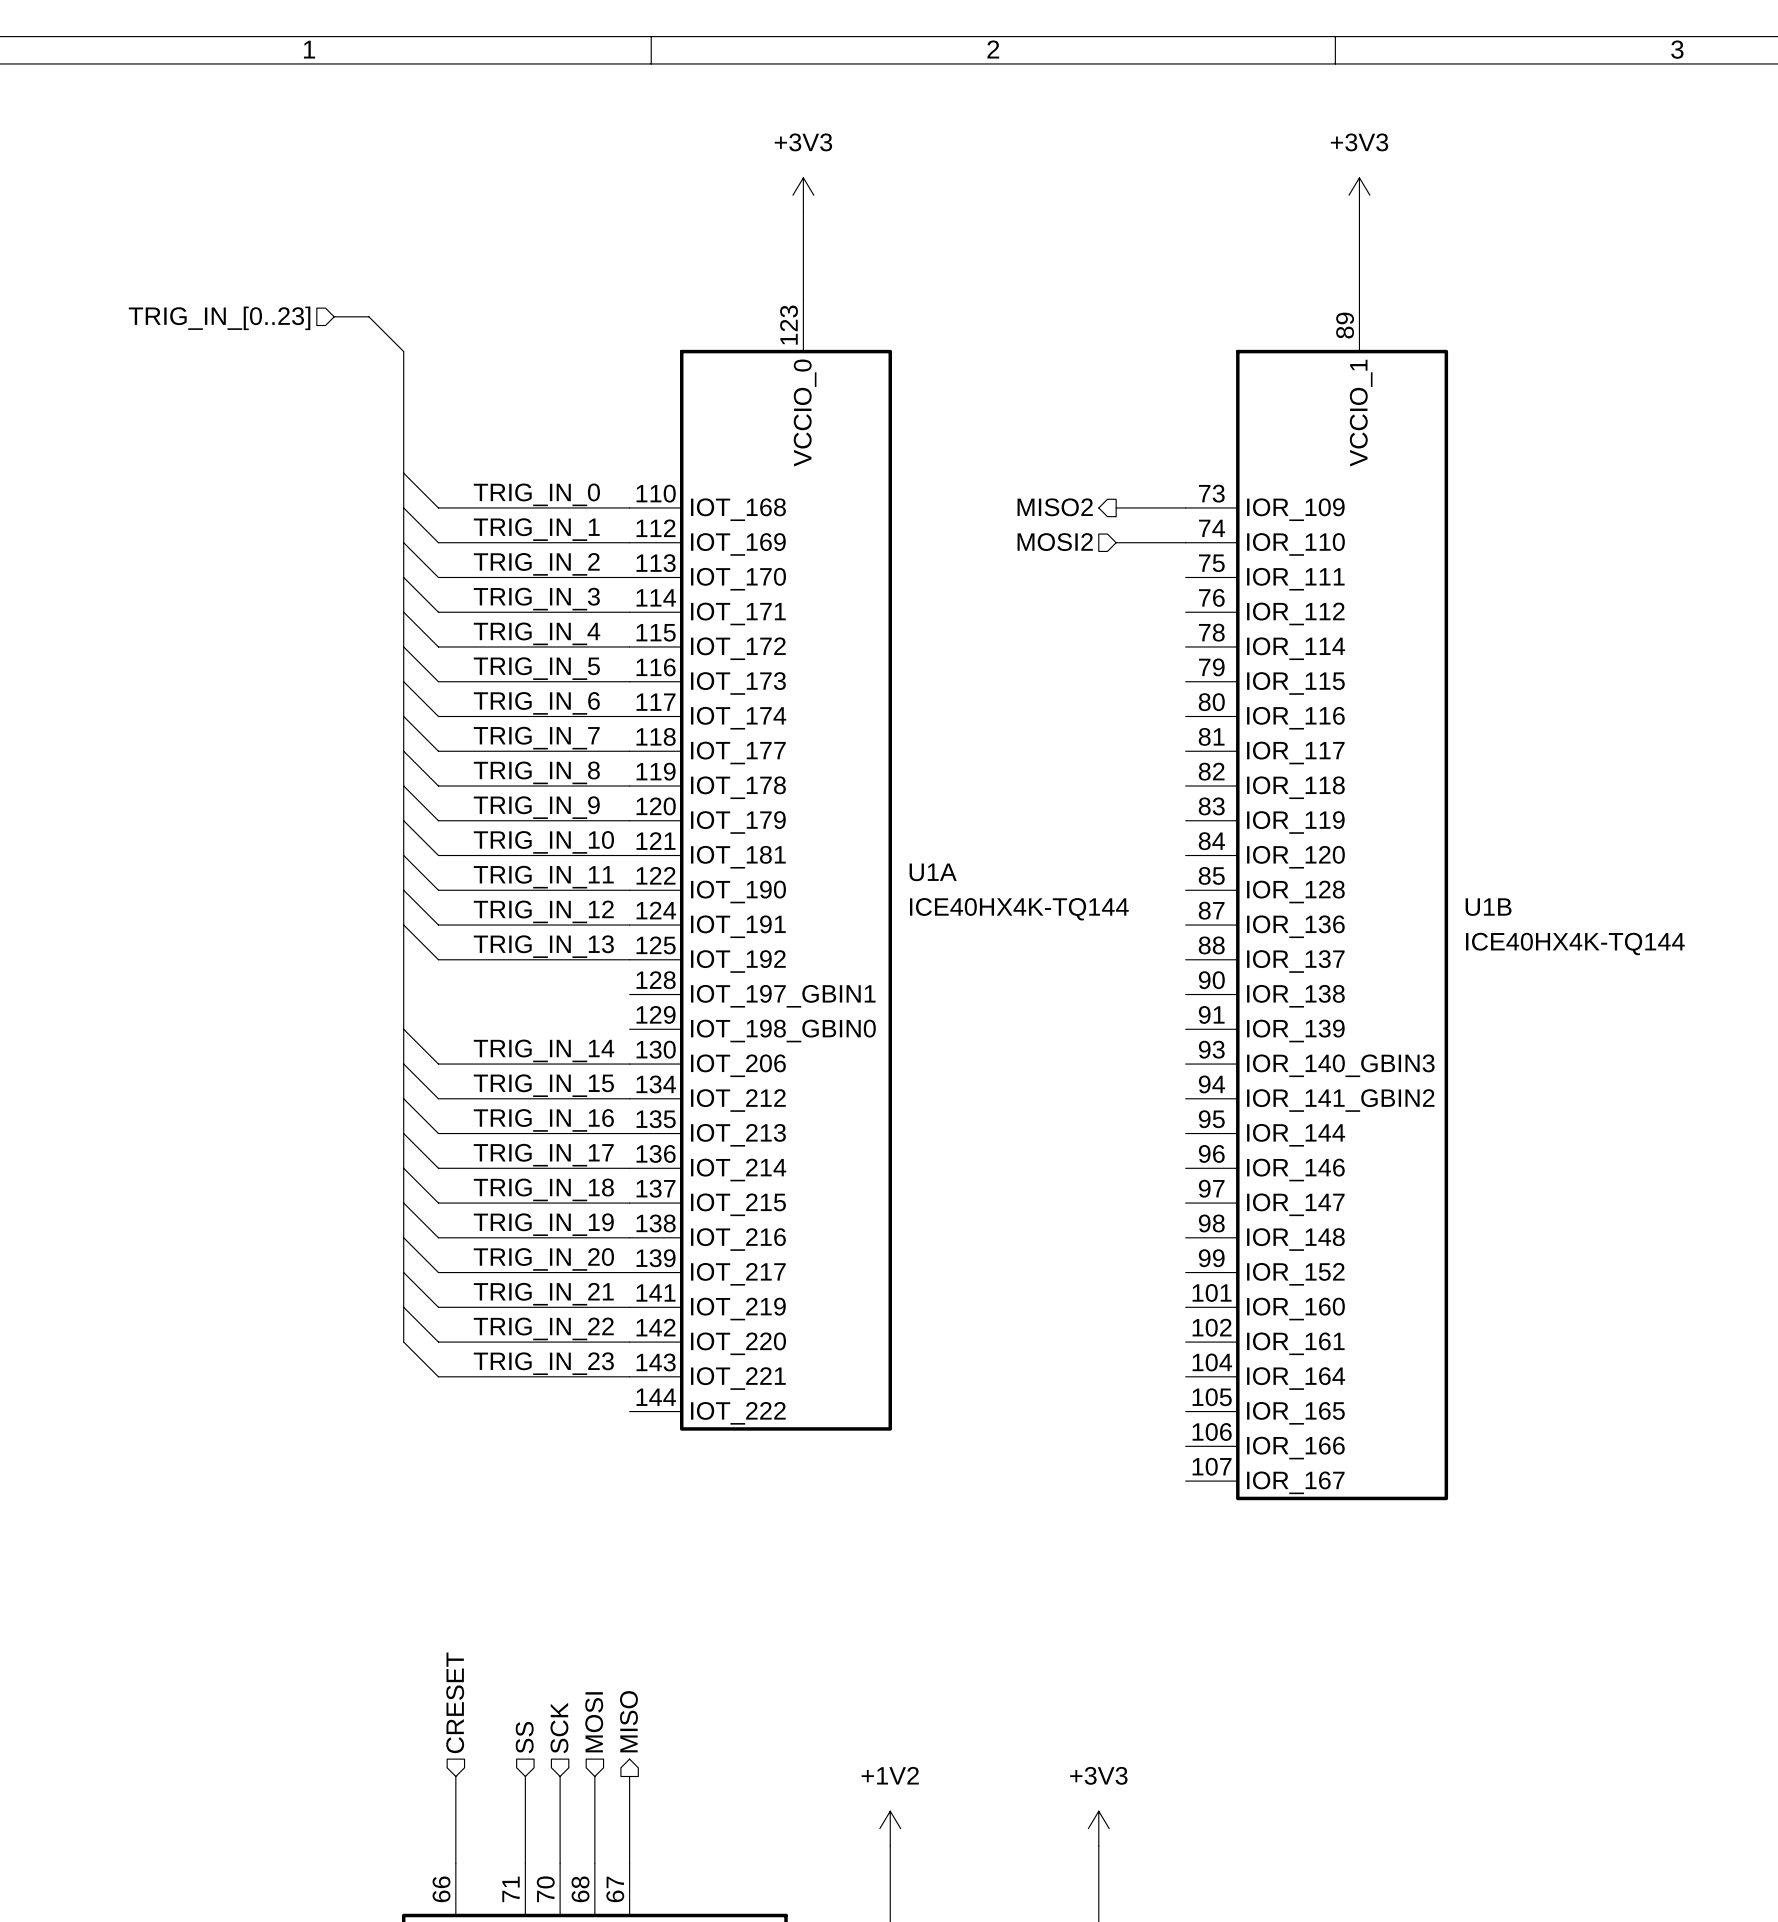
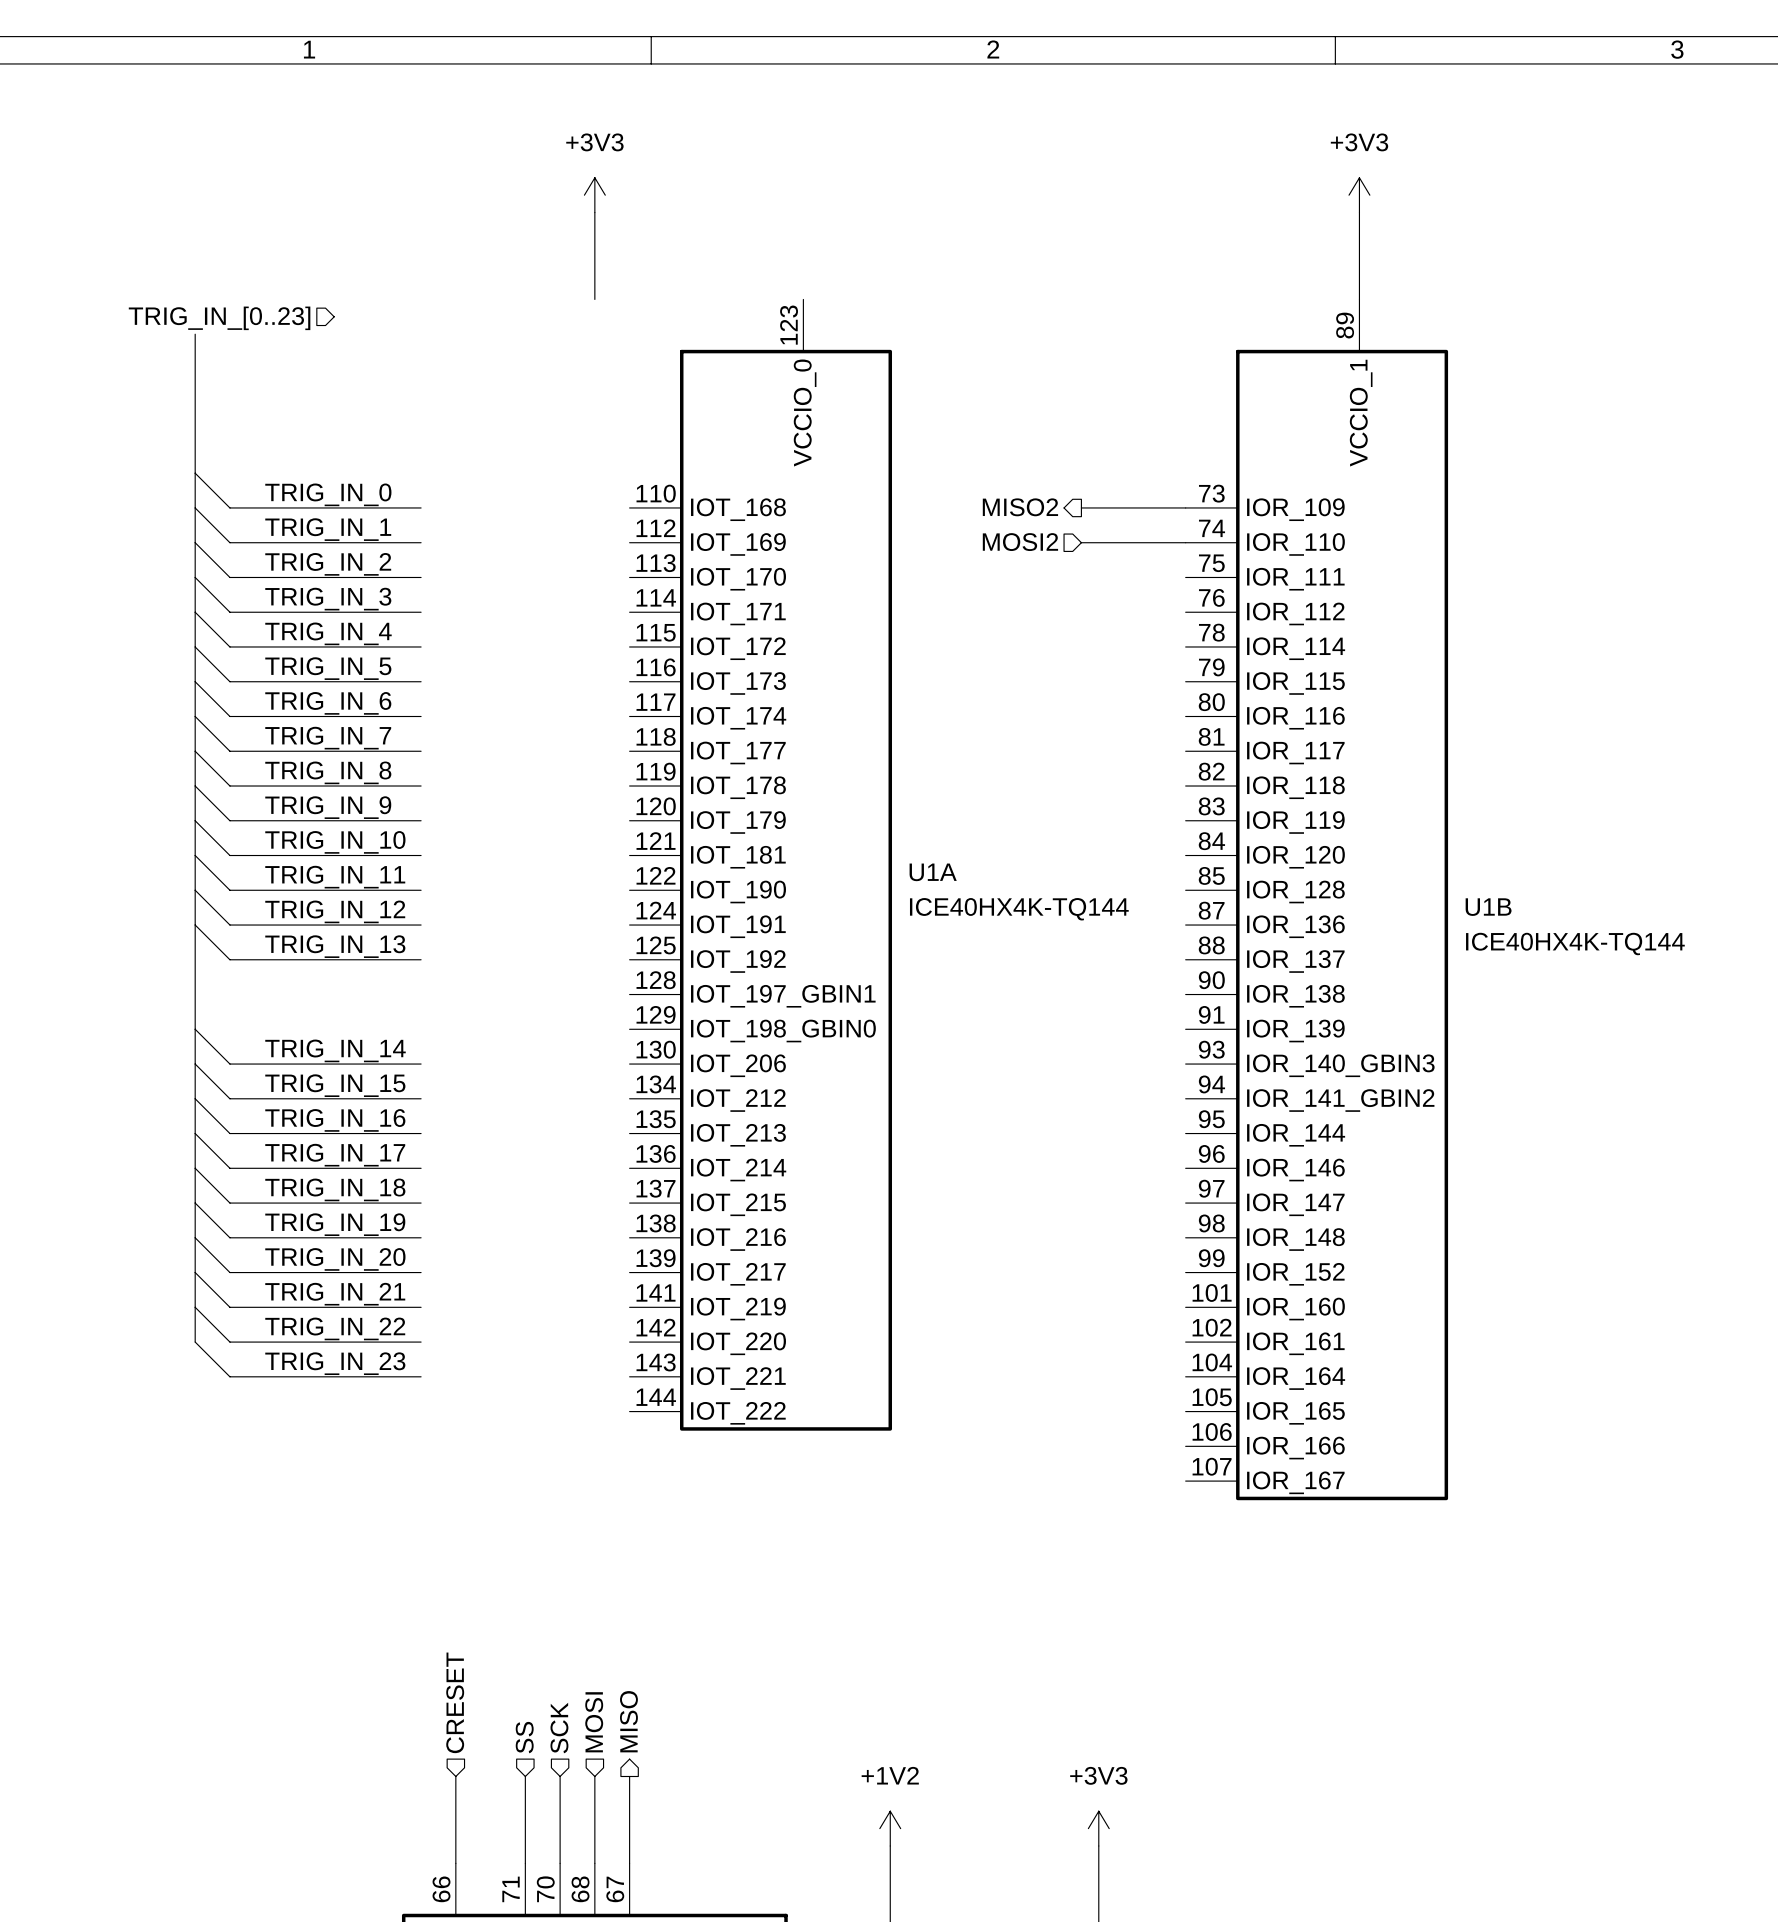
power symbol position: +3V3 (803, 195) -> +3V3 (594, 195)
wire: (803, 212) (803, 299) -> (594, 212) (594, 299)
bus: (334, 316) (368, 316) (403, 351) (403, 1342) -> none
bus: none -> (195, 334) (195, 1342)
wire: (403, 473) (438, 507) (629, 507) -> (195, 473) (229, 507) (421, 507)
label position: TRIG_IN_0 (536, 494) -> TRIG_IN_0 (328, 494)
wire: (403, 507) (438, 542) (629, 542) -> (195, 507) (229, 542) (421, 542)
hierarchical label position: MISO2 (1055, 507) -> MISO2 (1020, 507)
wire: none -> (1081, 507) (1116, 507)
label position: TRIG_IN_1 (536, 529) -> TRIG_IN_1 (328, 529)
wire: (403, 542) (438, 577) (629, 577) -> (195, 542) (229, 577) (421, 577)
hierarchical label position: MOSI2 (1055, 542) -> MOSI2 (1020, 542)
wire: none -> (1081, 542) (1116, 542)
label position: TRIG_IN_2 (536, 564) -> TRIG_IN_2 (328, 564)
wire: (403, 577) (438, 612) (629, 612) -> (195, 577) (229, 612) (421, 612)
label position: TRIG_IN_3 (536, 599) -> TRIG_IN_3 (328, 599)
wire: (403, 612) (438, 646) (629, 646) -> (195, 612) (229, 646) (421, 646)
label position: TRIG_IN_4 (537, 633) -> TRIG_IN_4 (328, 633)
wire: (403, 646) (438, 681) (629, 681) -> (195, 646) (229, 681) (421, 681)
label position: TRIG_IN_5 (536, 668) -> TRIG_IN_5 (328, 668)
wire: (403, 681) (438, 716) (629, 716) -> (195, 681) (229, 716) (421, 716)
label position: TRIG_IN_6 (536, 703) -> TRIG_IN_6 (328, 703)
wire: (403, 716) (438, 751) (629, 751) -> (195, 716) (229, 751) (421, 751)
label position: TRIG_IN_7 (536, 738) -> TRIG_IN_7 (328, 738)
wire: (403, 751) (438, 786) (629, 786) -> (195, 751) (229, 786) (421, 786)
label position: TRIG_IN_8 (536, 772) -> TRIG_IN_8 (328, 772)
wire: (403, 786) (438, 820) (629, 820) -> (195, 786) (229, 820) (421, 820)
label position: TRIG_IN_9 (536, 807) -> TRIG_IN_9 (328, 807)
wire: (403, 820) (438, 855) (629, 855) -> (195, 820) (229, 855) (421, 855)
label position: TRIG_IN_10 (543, 842) -> TRIG_IN_10 (335, 842)
wire: (403, 855) (438, 890) (629, 890) -> (195, 855) (229, 890) (421, 890)
label position: TRIG_IN_11 (543, 877) -> TRIG_IN_11 (335, 877)
wire: (403, 890) (438, 925) (629, 925) -> (195, 890) (229, 925) (421, 925)
label position: TRIG_IN_12 (543, 911) -> TRIG_IN_12 (335, 911)
wire: (403, 925) (438, 959) (629, 959) -> (195, 925) (229, 959) (421, 959)
label position: TRIG_IN_13 (543, 946) -> TRIG_IN_13 (335, 946)
wire: (403, 1029) (438, 1064) (629, 1064) -> (195, 1029) (229, 1064) (421, 1064)
label position: TRIG_IN_14 (544, 1050) -> TRIG_IN_14 (335, 1050)
wire: (403, 1064) (438, 1098) (629, 1098) -> (195, 1064) (229, 1098) (421, 1098)
label position: TRIG_IN_15 (543, 1085) -> TRIG_IN_15 (335, 1085)
wire: (403, 1098) (438, 1133) (629, 1133) -> (195, 1098) (229, 1133) (421, 1133)
label position: TRIG_IN_16 (543, 1120) -> TRIG_IN_16 (335, 1120)
wire: (403, 1133) (438, 1168) (629, 1168) -> (195, 1133) (229, 1168) (421, 1168)
label position: TRIG_IN_17 (543, 1155) -> TRIG_IN_17 (335, 1155)
wire: (403, 1168) (438, 1203) (629, 1203) -> (195, 1168) (229, 1203) (421, 1203)
label position: TRIG_IN_18 (543, 1189) -> TRIG_IN_18 (335, 1189)
wire: (403, 1203) (438, 1237) (629, 1237) -> (195, 1203) (229, 1237) (421, 1237)
label position: TRIG_IN_19 (543, 1224) -> TRIG_IN_19 (335, 1224)
wire: (403, 1237) (438, 1272) (629, 1272) -> (195, 1237) (229, 1272) (421, 1272)
label position: TRIG_IN_20 (543, 1259) -> TRIG_IN_20 (335, 1259)
wire: (403, 1272) (438, 1307) (629, 1307) -> (195, 1272) (229, 1307) (421, 1307)
label position: TRIG_IN_21 (543, 1294) -> TRIG_IN_21 (335, 1294)
wire: (403, 1307) (438, 1342) (629, 1342) -> (195, 1307) (229, 1342) (421, 1342)
label position: TRIG_IN_22 (543, 1328) -> TRIG_IN_22 (335, 1328)
wire: (403, 1342) (438, 1376) (629, 1376) -> (195, 1342) (229, 1376) (421, 1376)
label position: TRIG_IN_23 (543, 1363) -> TRIG_IN_23 (335, 1363)

